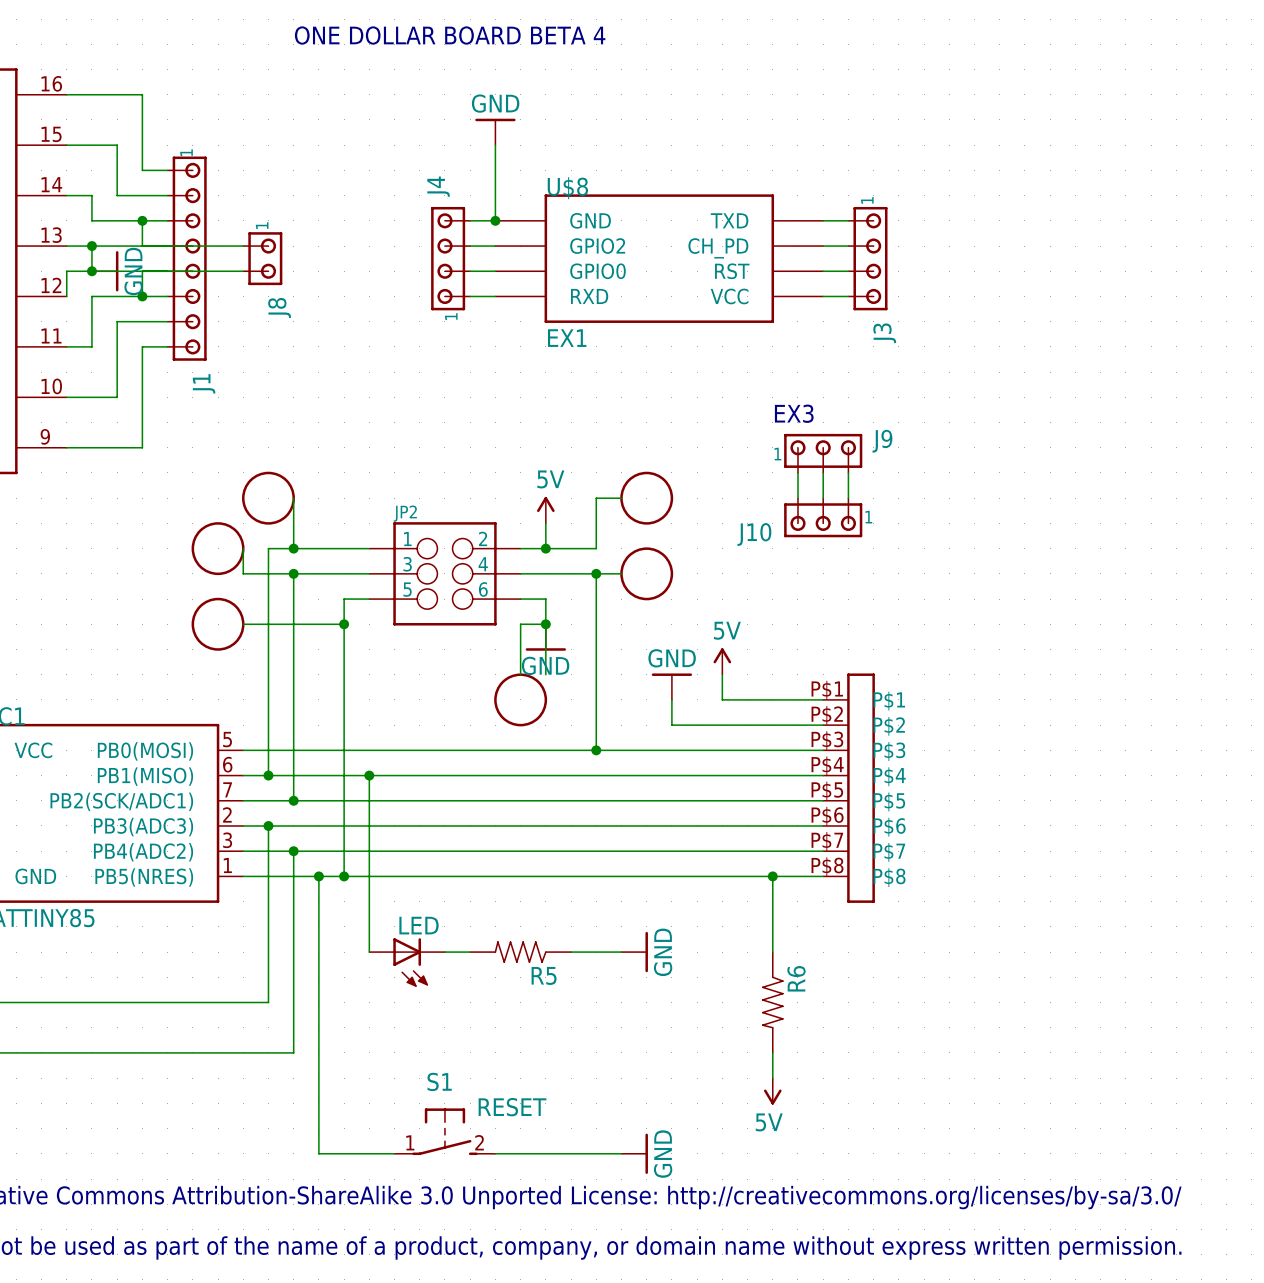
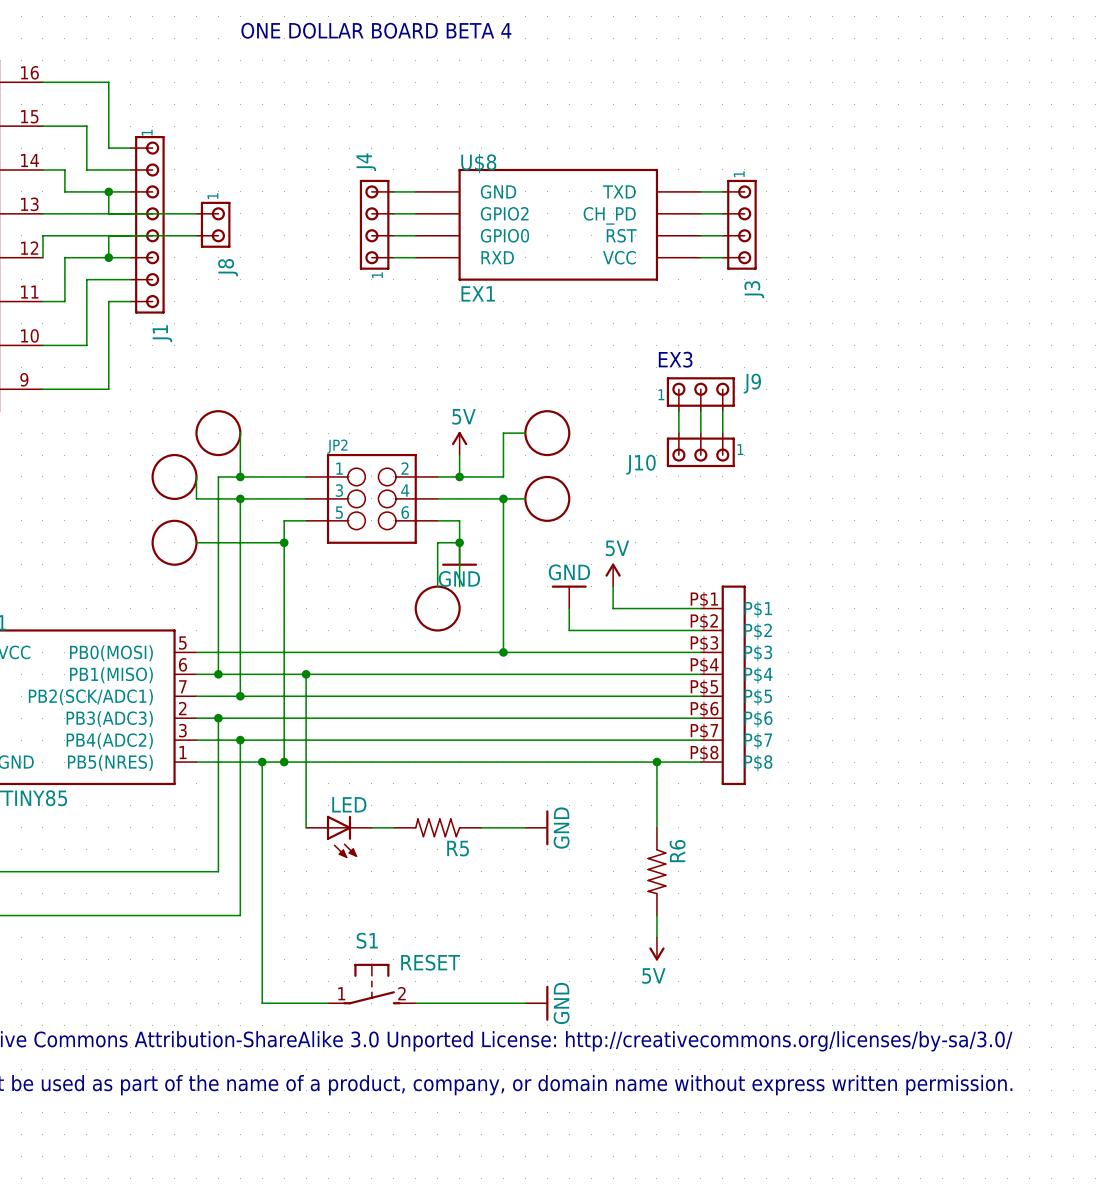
power symbol: GND (495, 131) -> none
wire: (495, 145) (495, 220) -> none
junction: (495, 220) -> none
wire: (91, 246) (91, 271) -> none
junction: (91, 246) -> none
junction: (91, 271) -> none
power symbol: GND (105, 271) -> none

